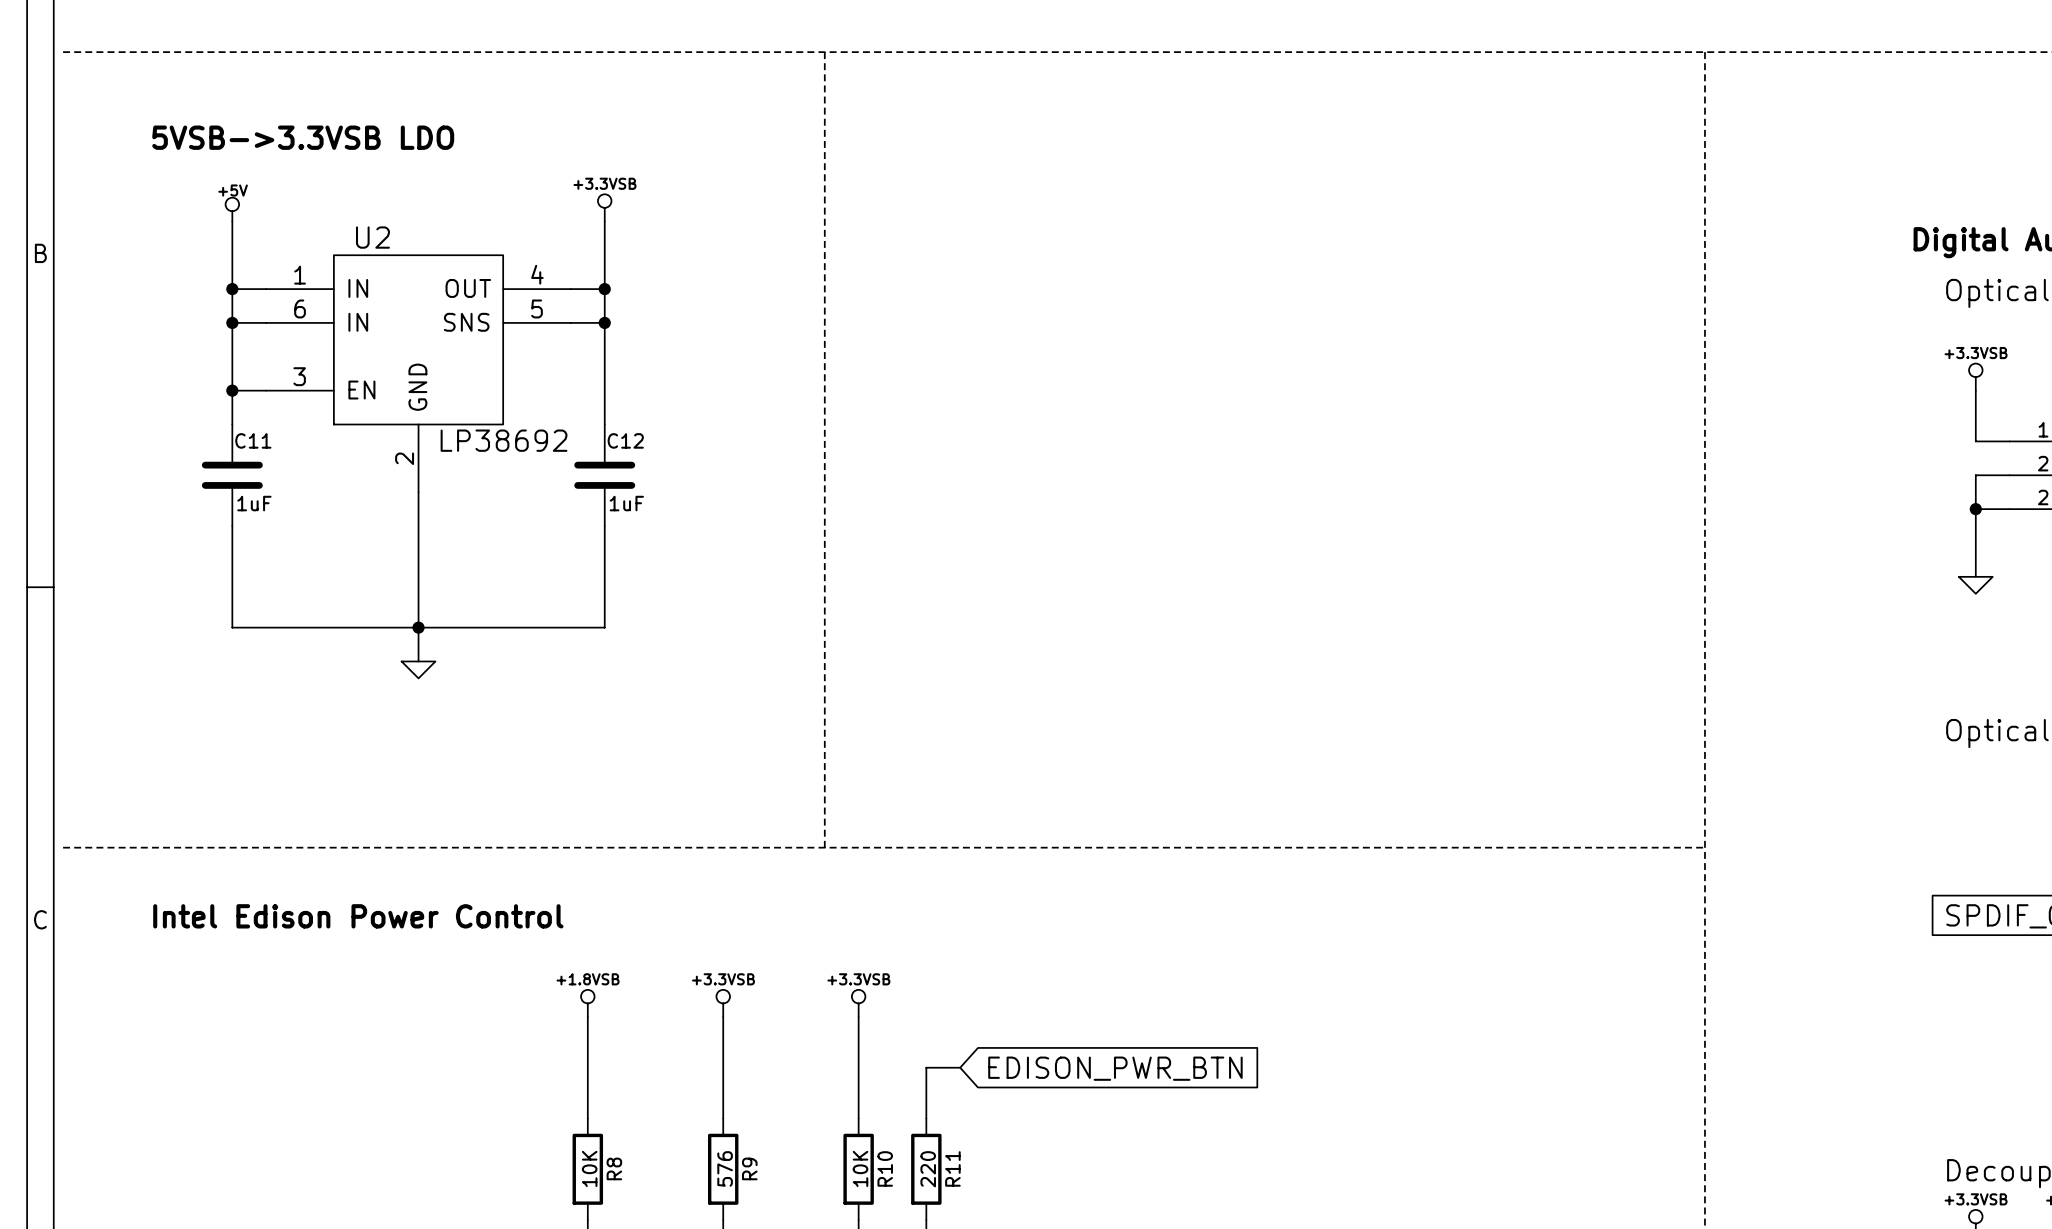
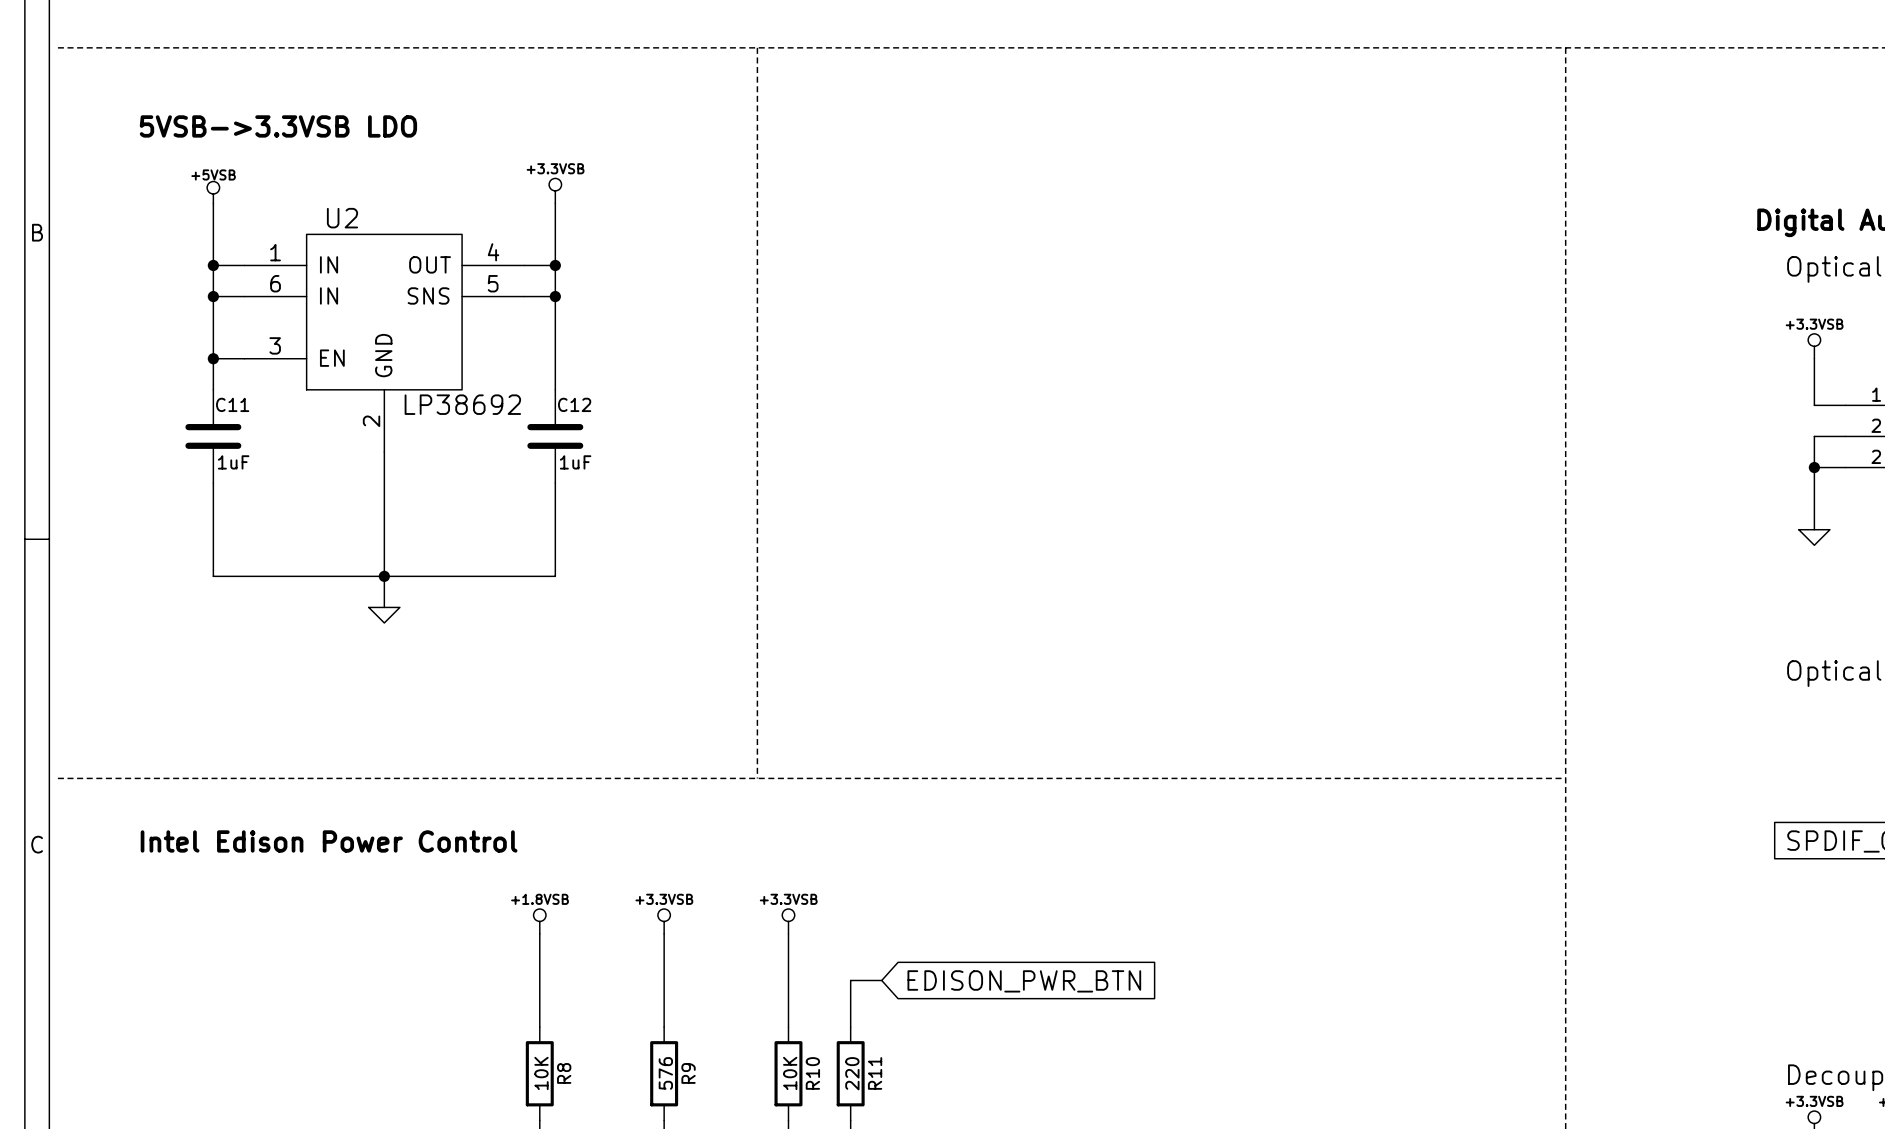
power symbol: +5V (232, 209) -> +5VSB (213, 192)

